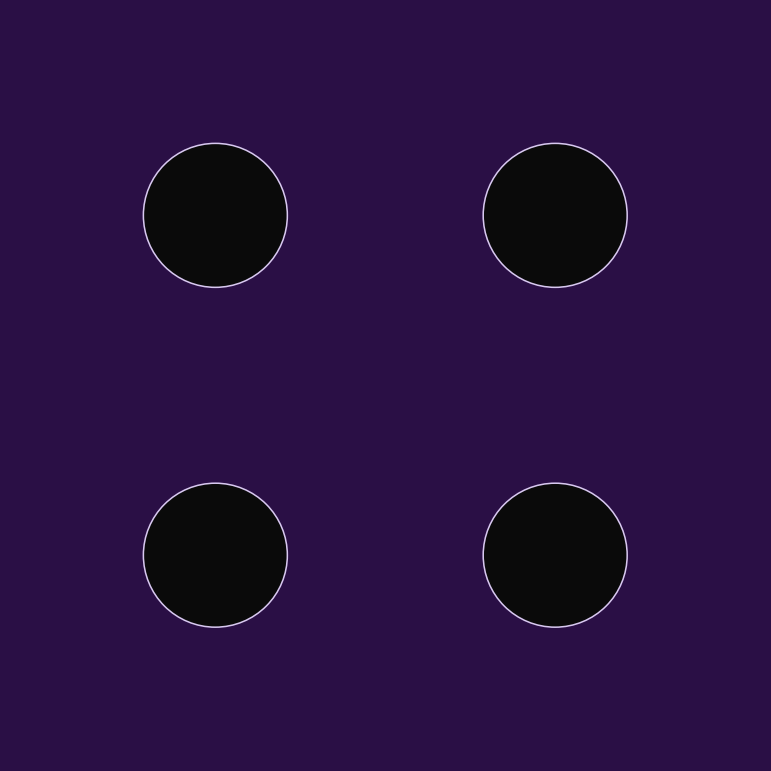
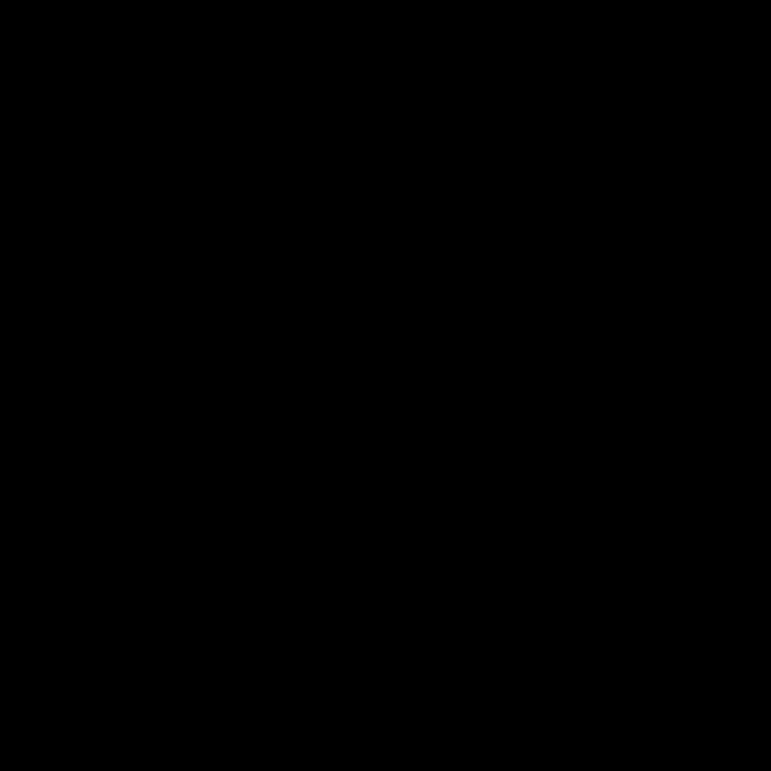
part: (215, 215) -> none
part: (555, 215) -> none
part: (215, 555) -> none
part: (555, 555) -> none

